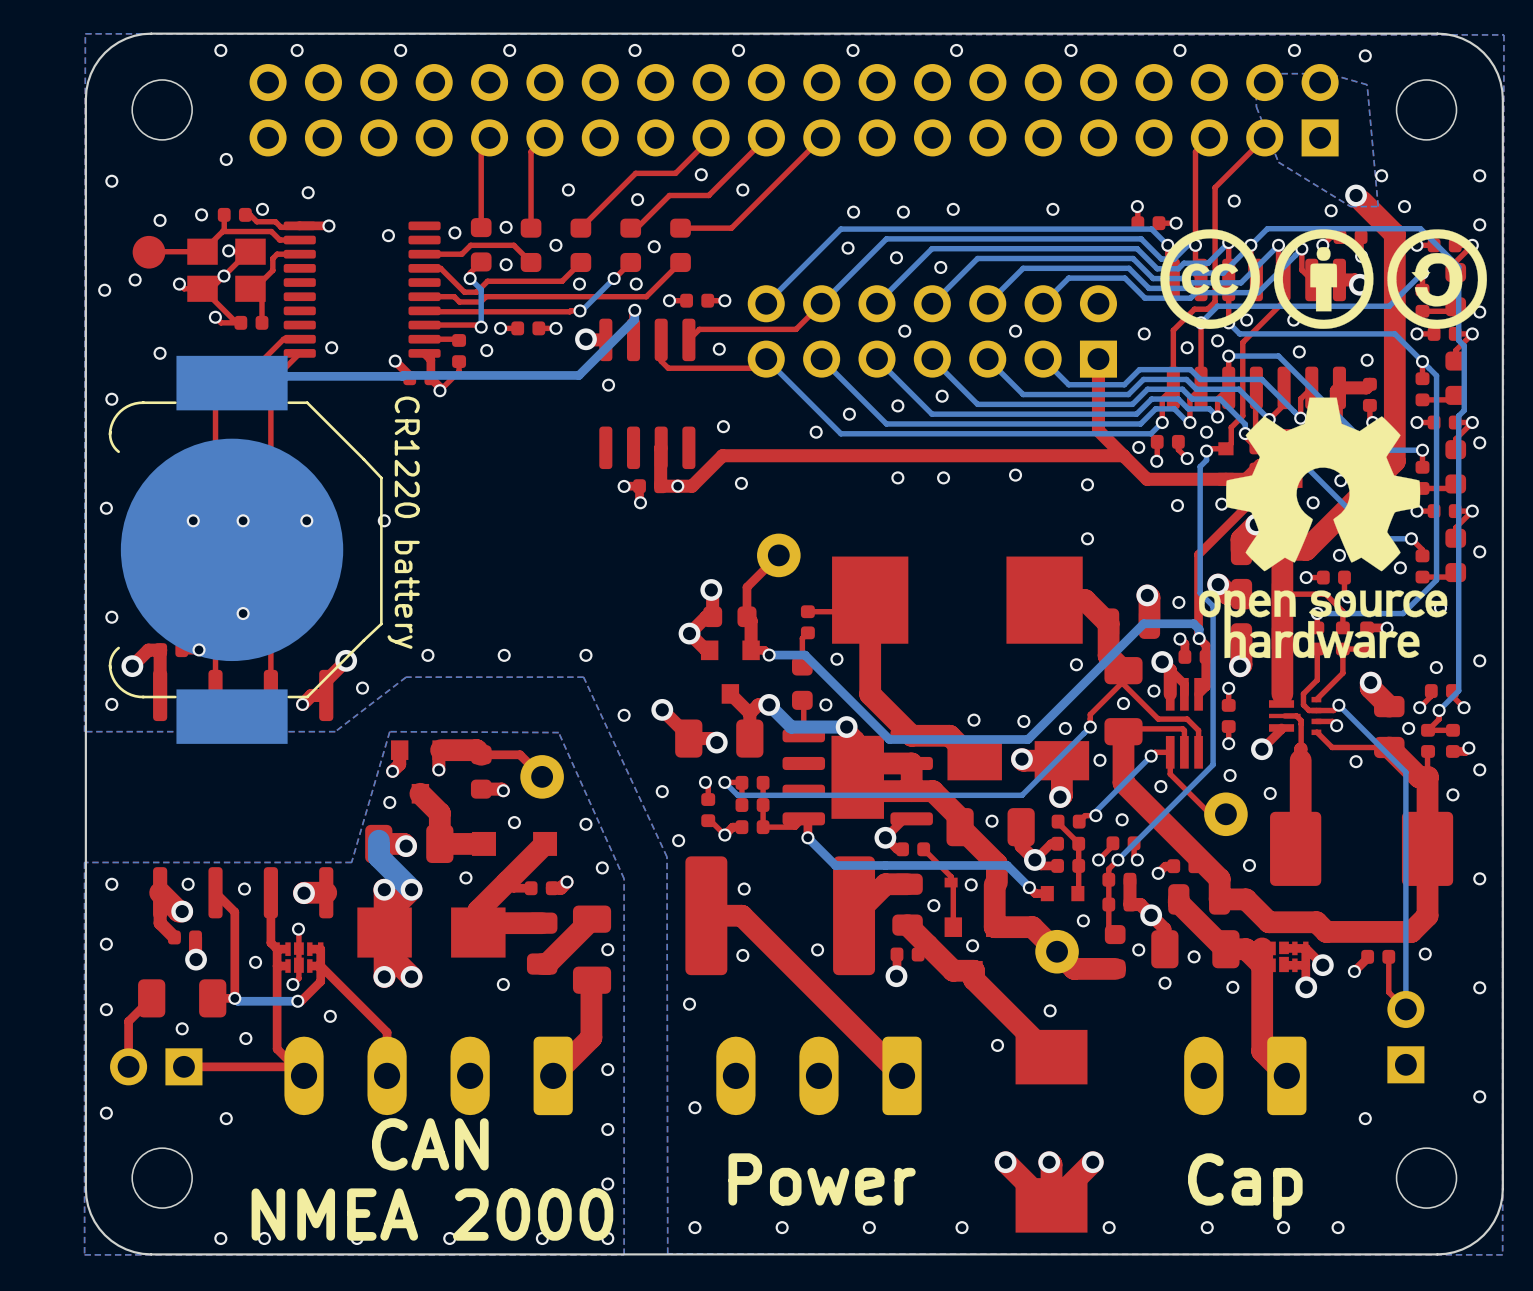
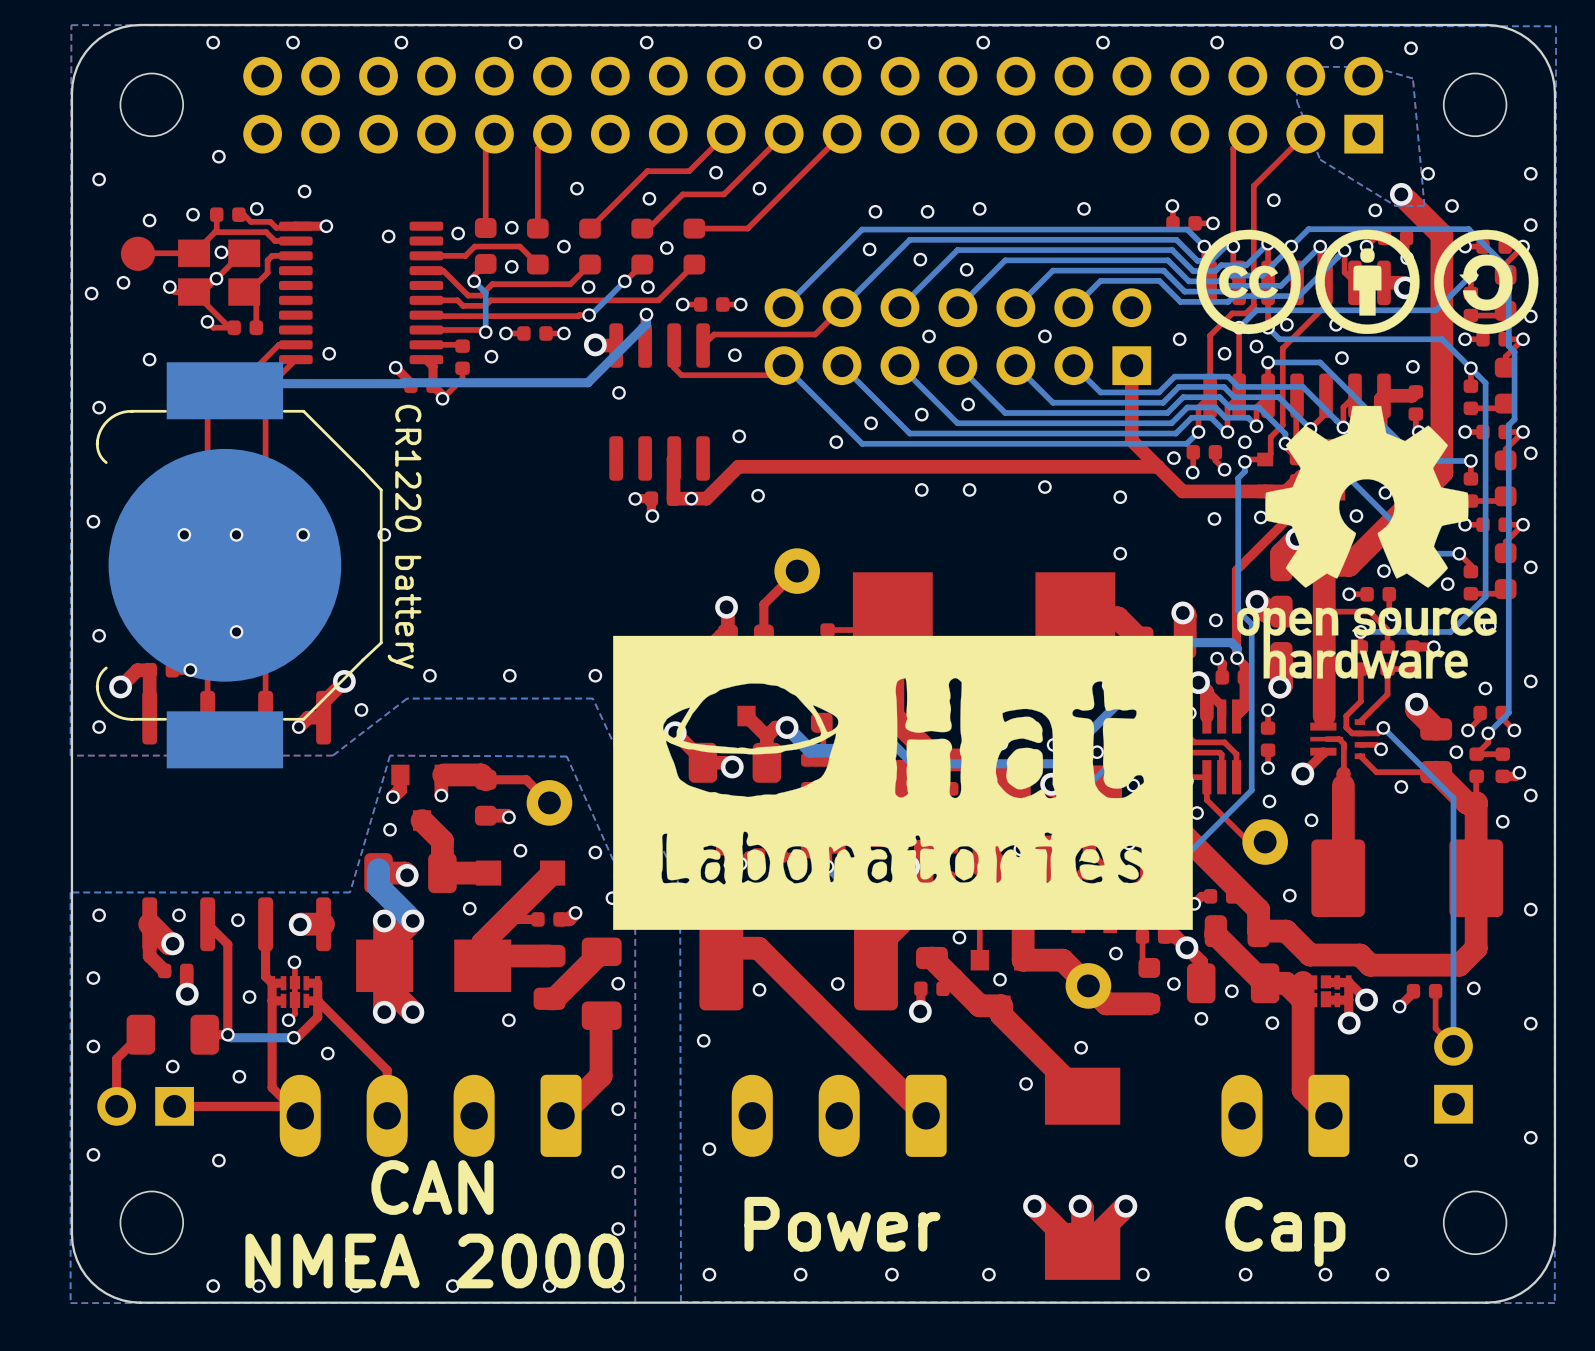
drawing: none -> [613, 635, 1193, 930]

